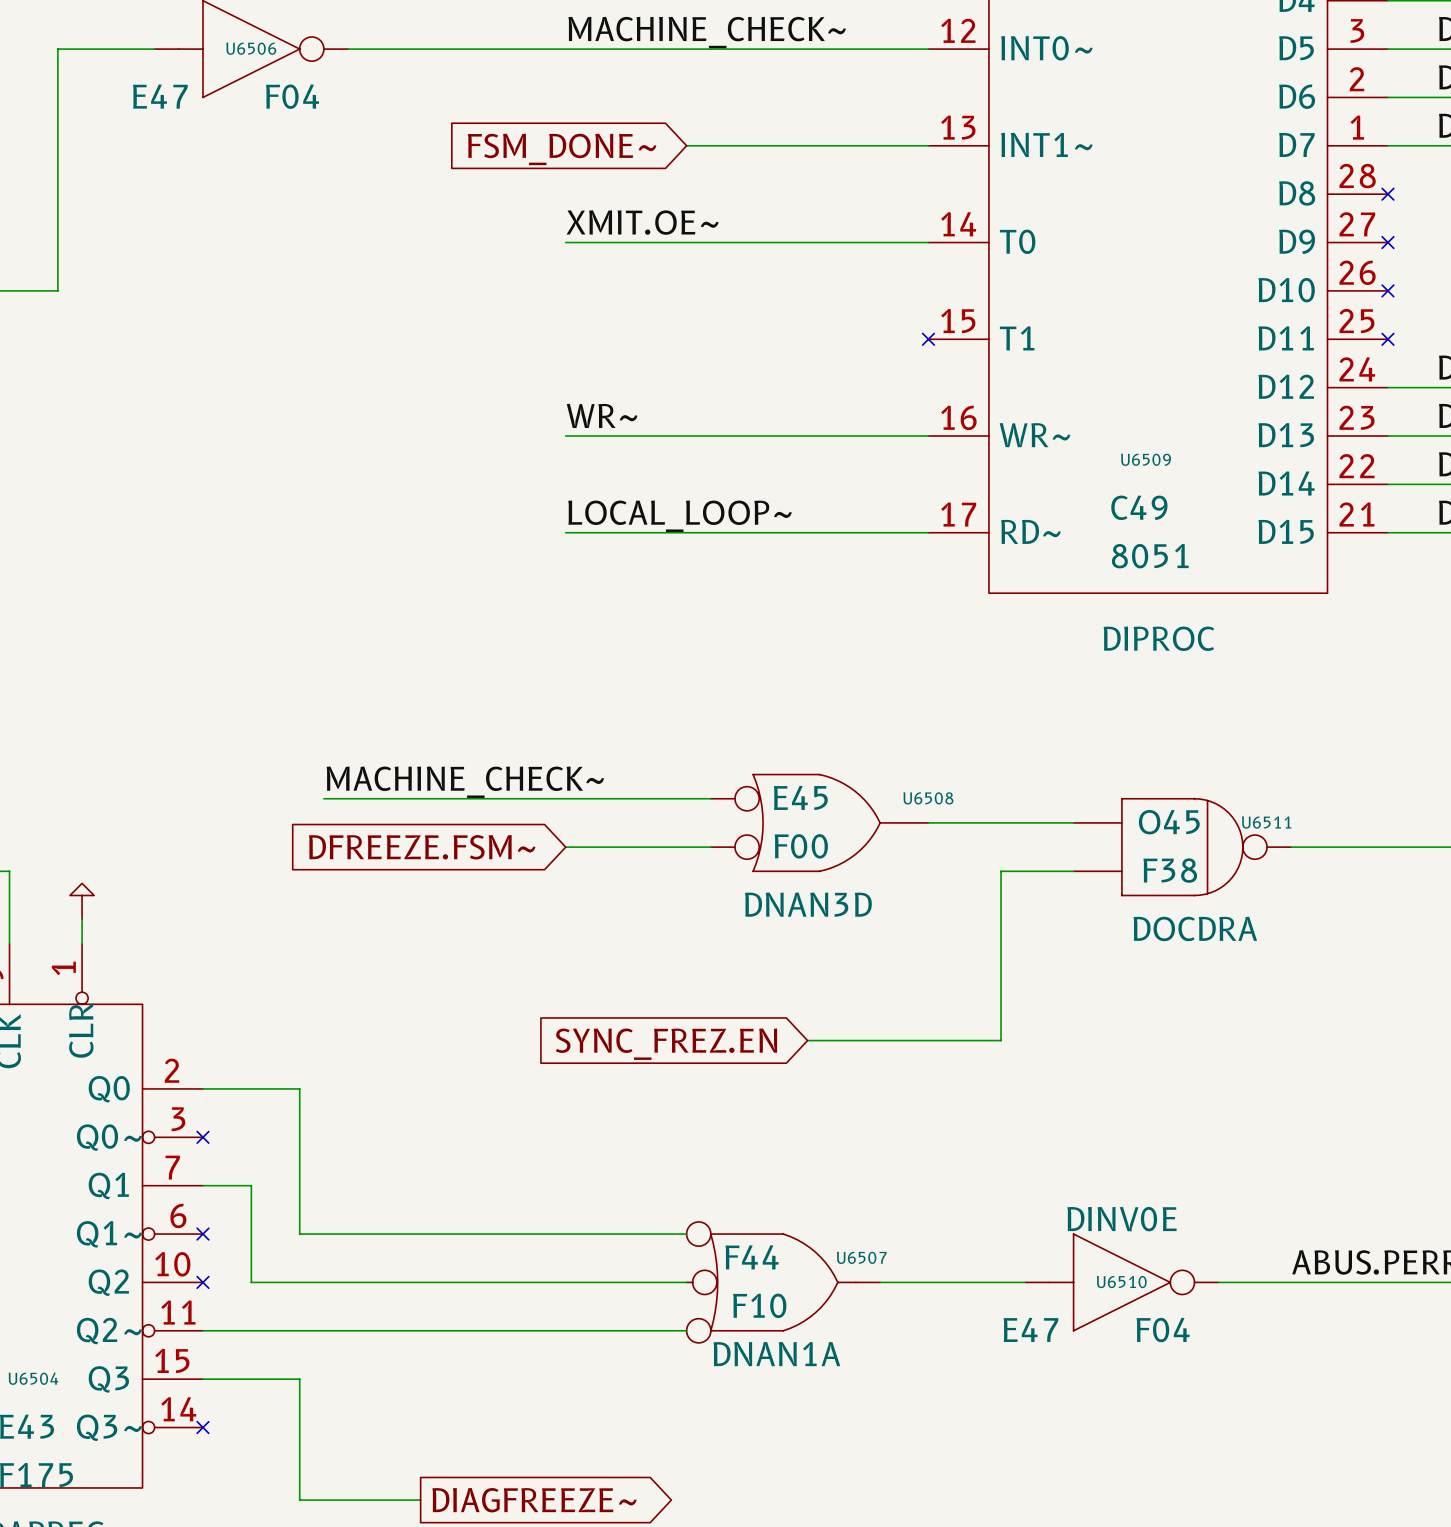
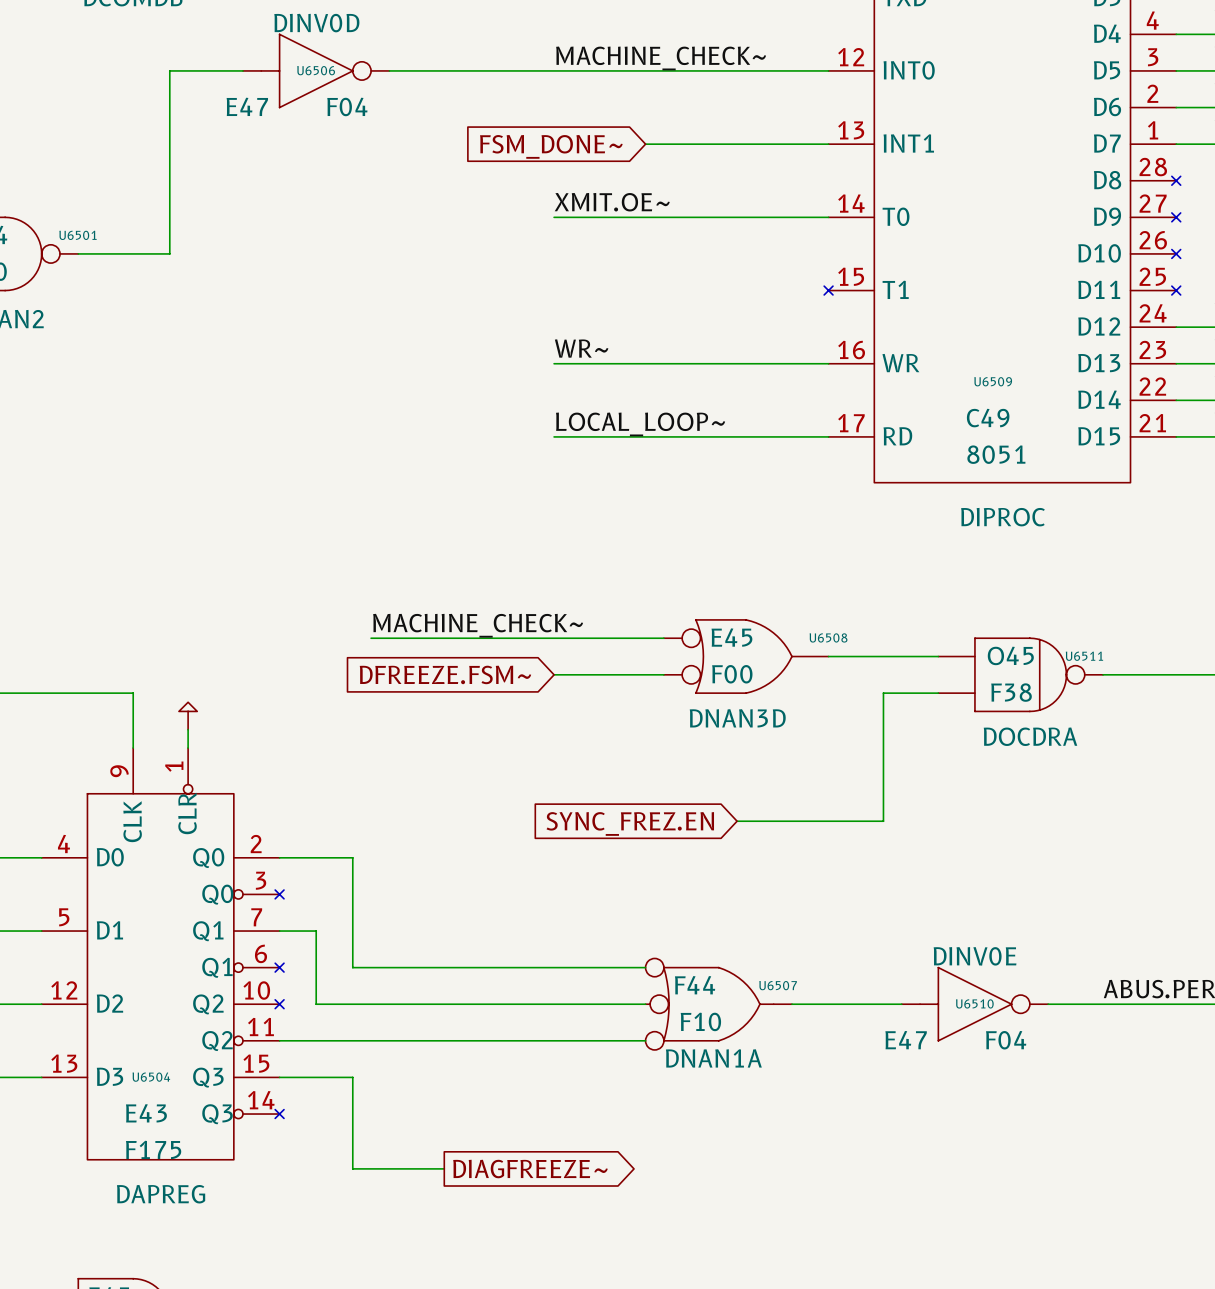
U6509 pin name: INT0~ (1046, 48) -> INT0 (909, 70)
U6509 pin name: INT1~ (1046, 144) -> INT1 (908, 143)
U6509 pin name: WR~ (1034, 435) -> WR (900, 363)
U6509 pin name: RD~ (1030, 531) -> RD (897, 436)
U6504 pin name: Q0~ (109, 1137) -> Q0 (217, 894)
U6504 pin name: Q1~ (109, 1234) -> Q1 (217, 967)
U6504 pin name: Q2~ (109, 1331) -> Q2 (217, 1041)
U6504 pin name: Q3~ (109, 1427) -> Q3 (217, 1114)

